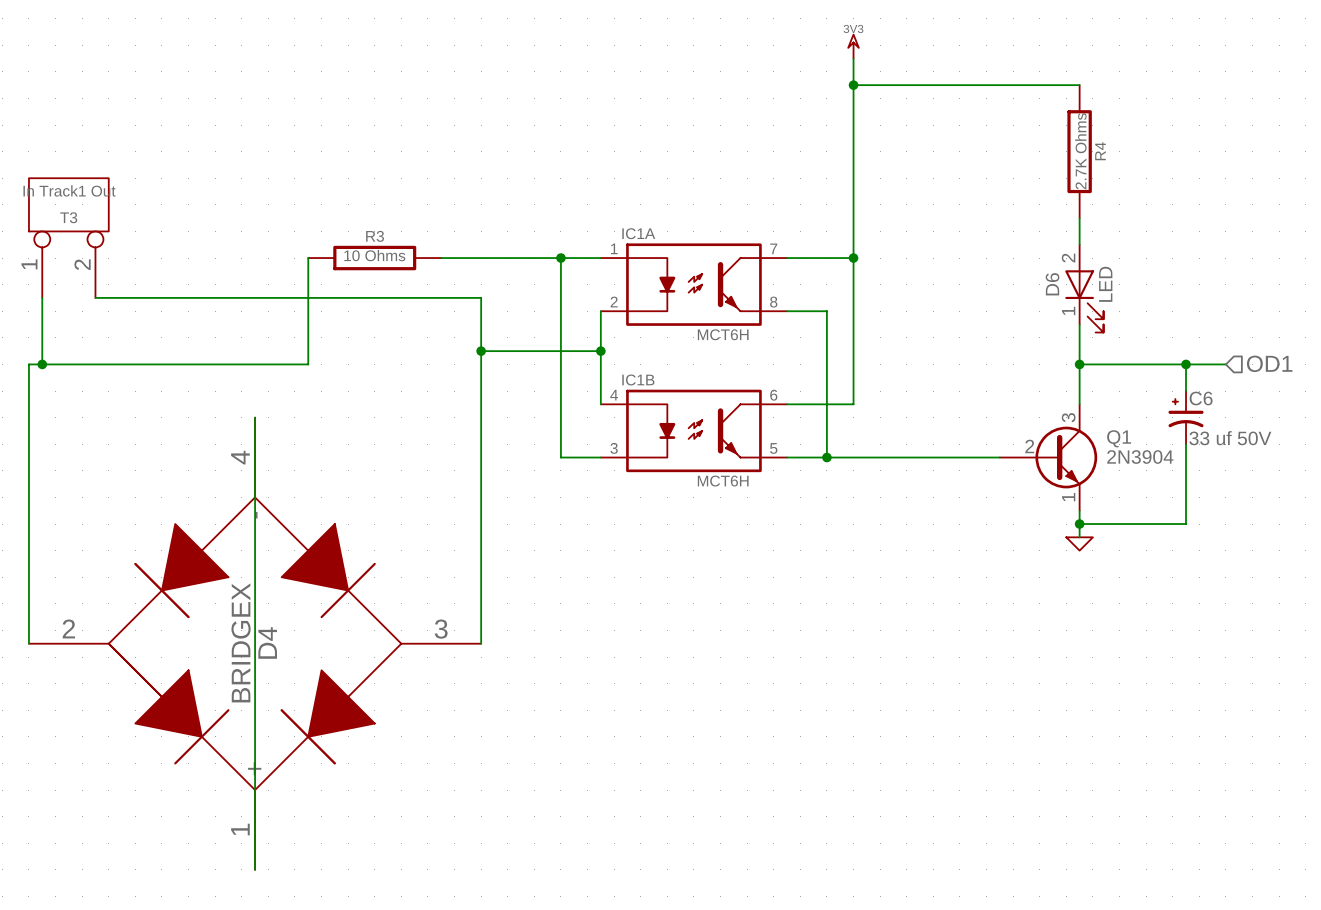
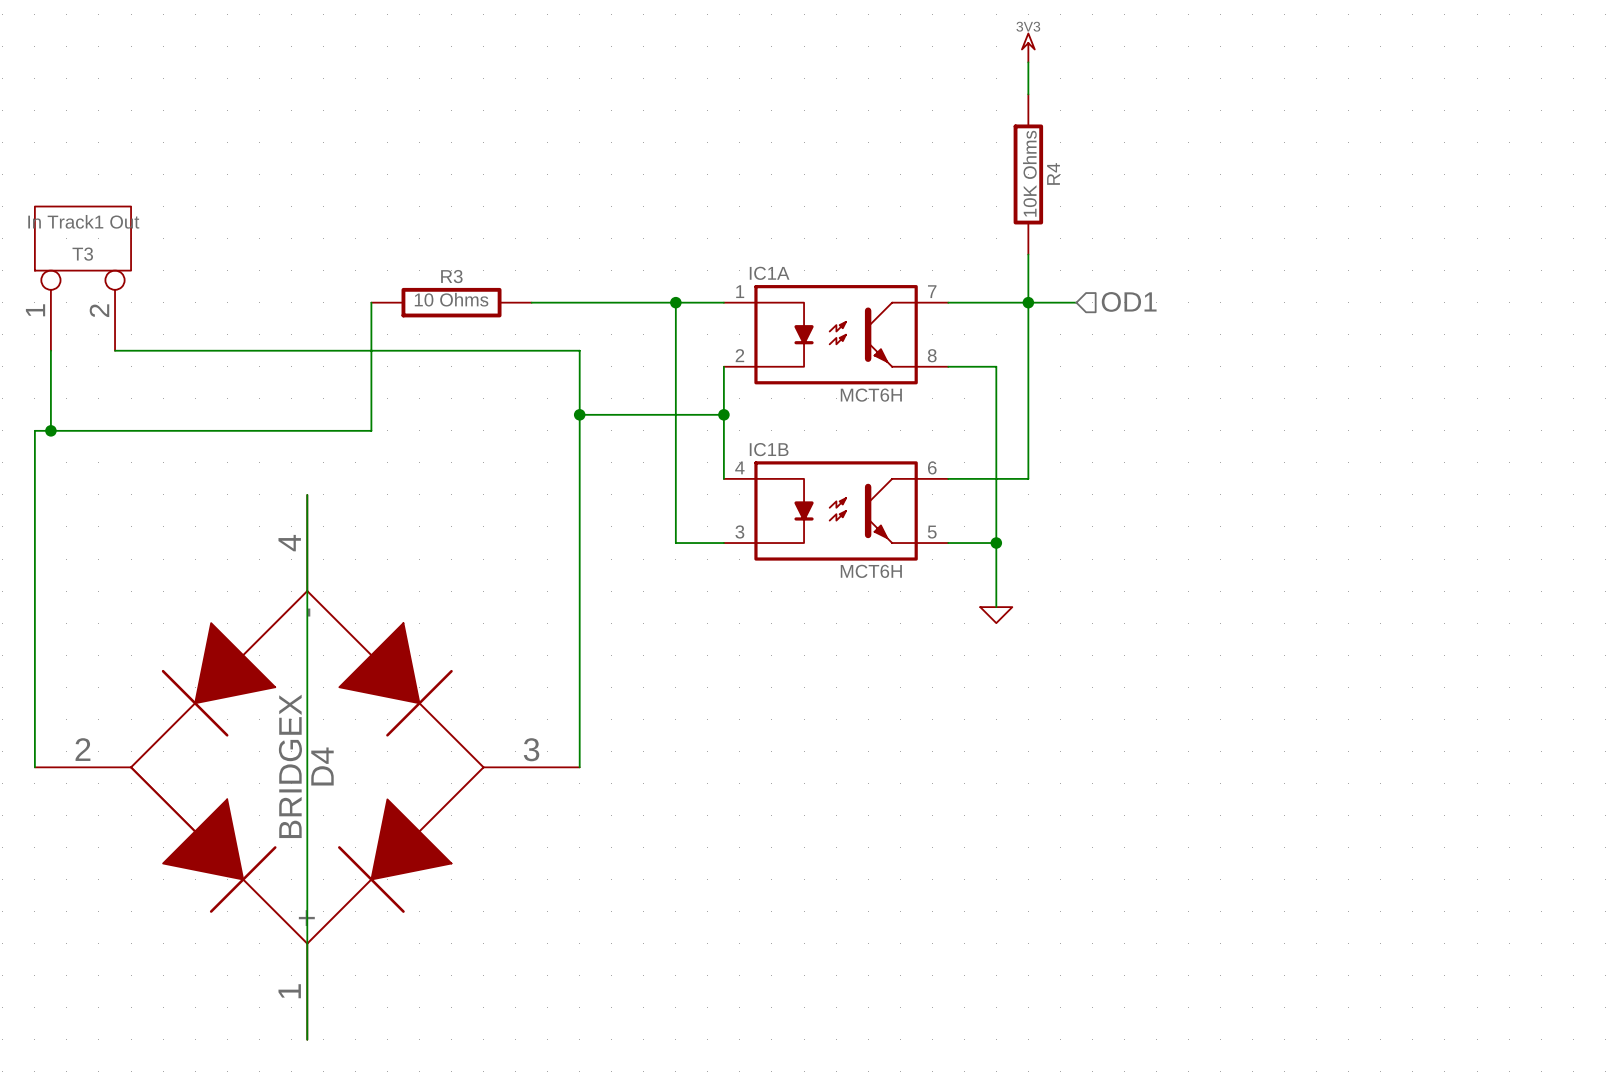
junction: (853, 85) -> none
wire: (1079, 85) (853, 85) (853, 218) -> none
R4 position: (1079, 151) -> (1028, 174)
R4 value: 2.7K Ohms (1080, 151) -> 10K Ohms (1029, 173)
wire: (1079, 218) (1079, 244) -> none
hierarchical label: none -> OD1 (1129, 301)
wire: none -> (1028, 302) (1076, 302)
D6: LED (1084, 288) -> none
wire: (1079, 324) (1079, 404) -> none
hierarchical label: OD1 (1269, 363) -> none
wire: (1079, 364) (1225, 364) -> none
junction: (1079, 364) -> none
wire: (1186, 364) (1186, 391) -> none
junction: (1186, 364) -> none
C6: 33 uf 50V (1186, 417) -> none
wire: (1186, 444) (1186, 524) (1079, 524) -> none
wire: (826, 457) (999, 457) -> (996, 543) (996, 607)
Q1: 2N3904 (1048, 457) -> none
wire: (1079, 510) (1079, 537) -> none
junction: (1079, 524) -> none
power symbol position: (1079, 543) -> (996, 615)

